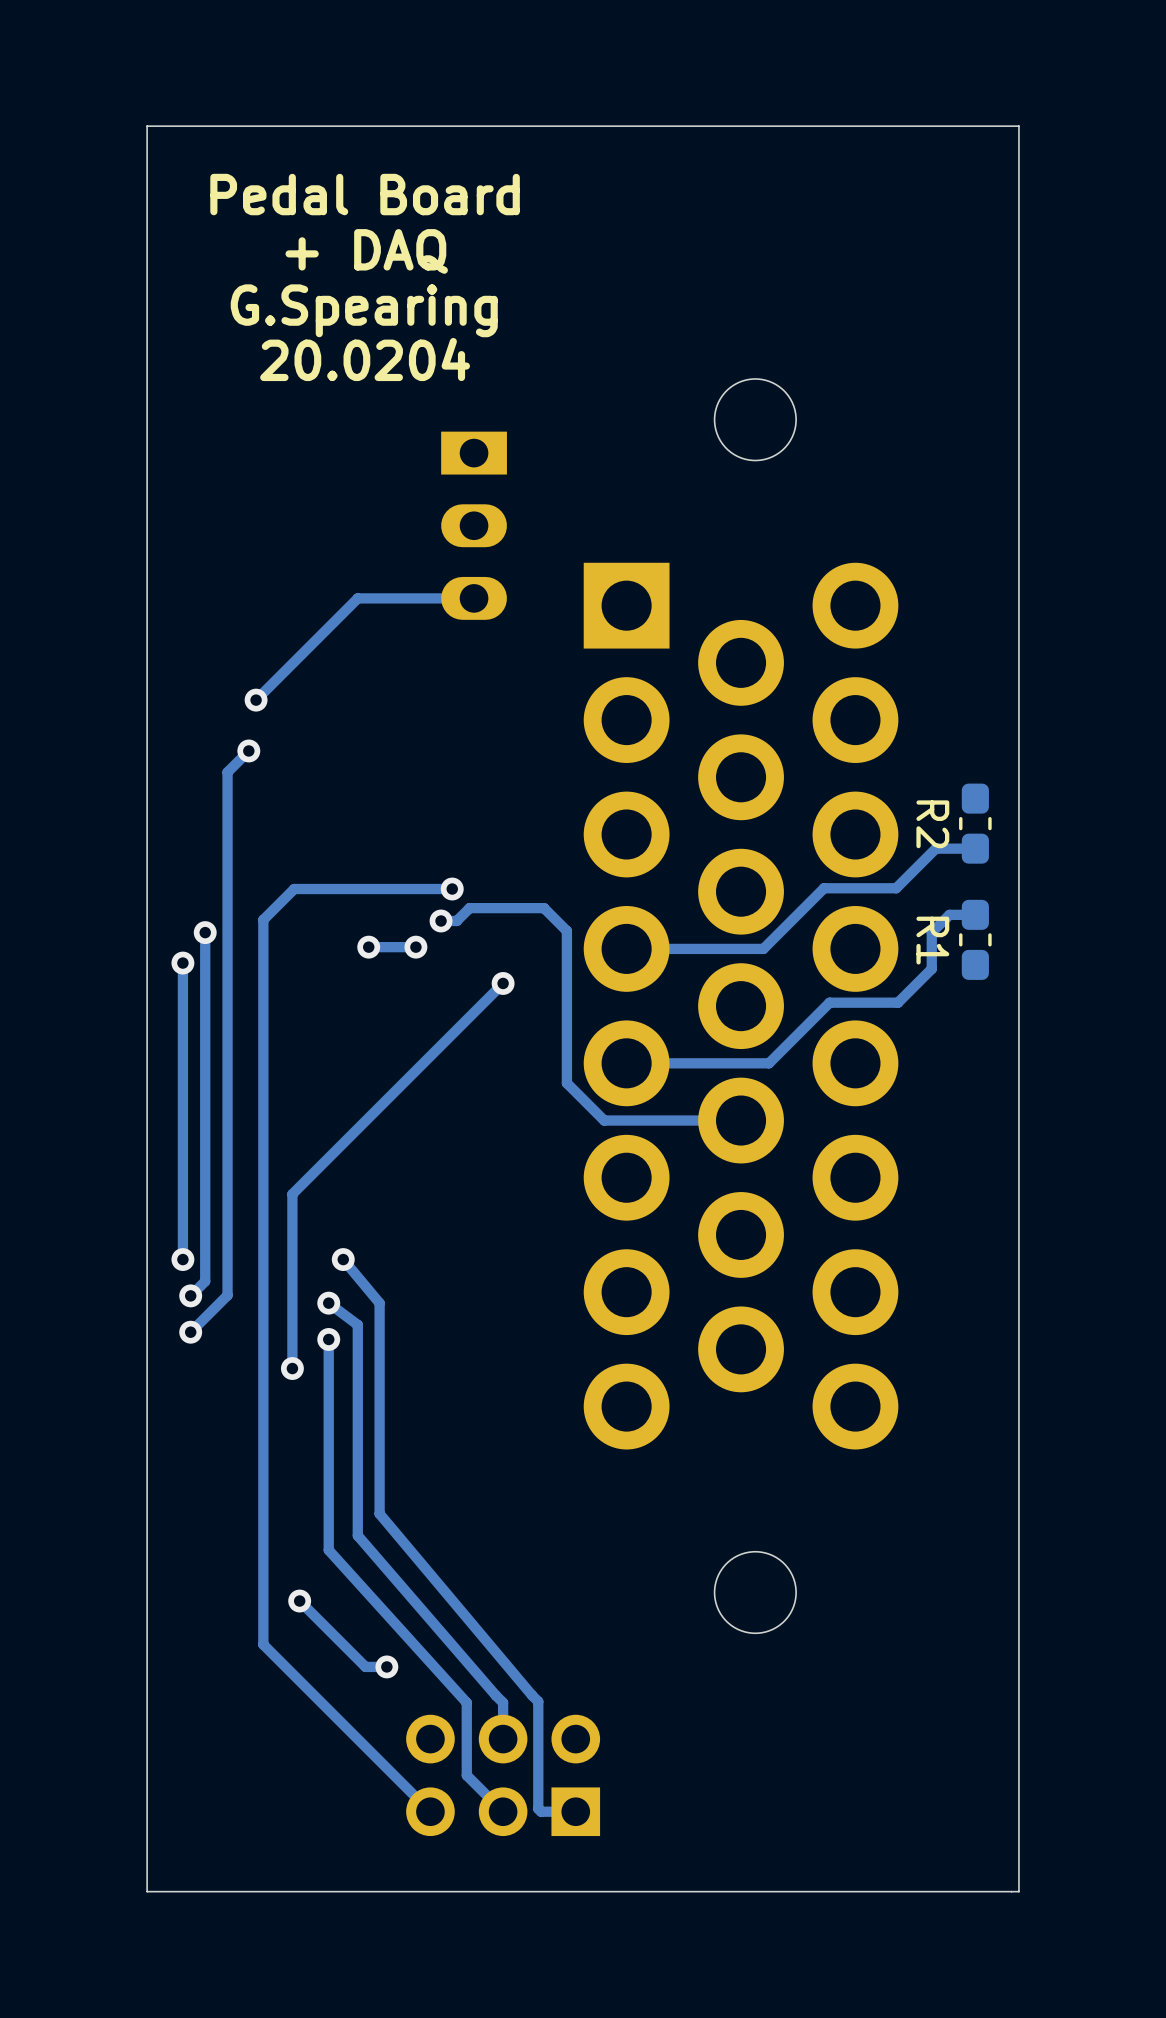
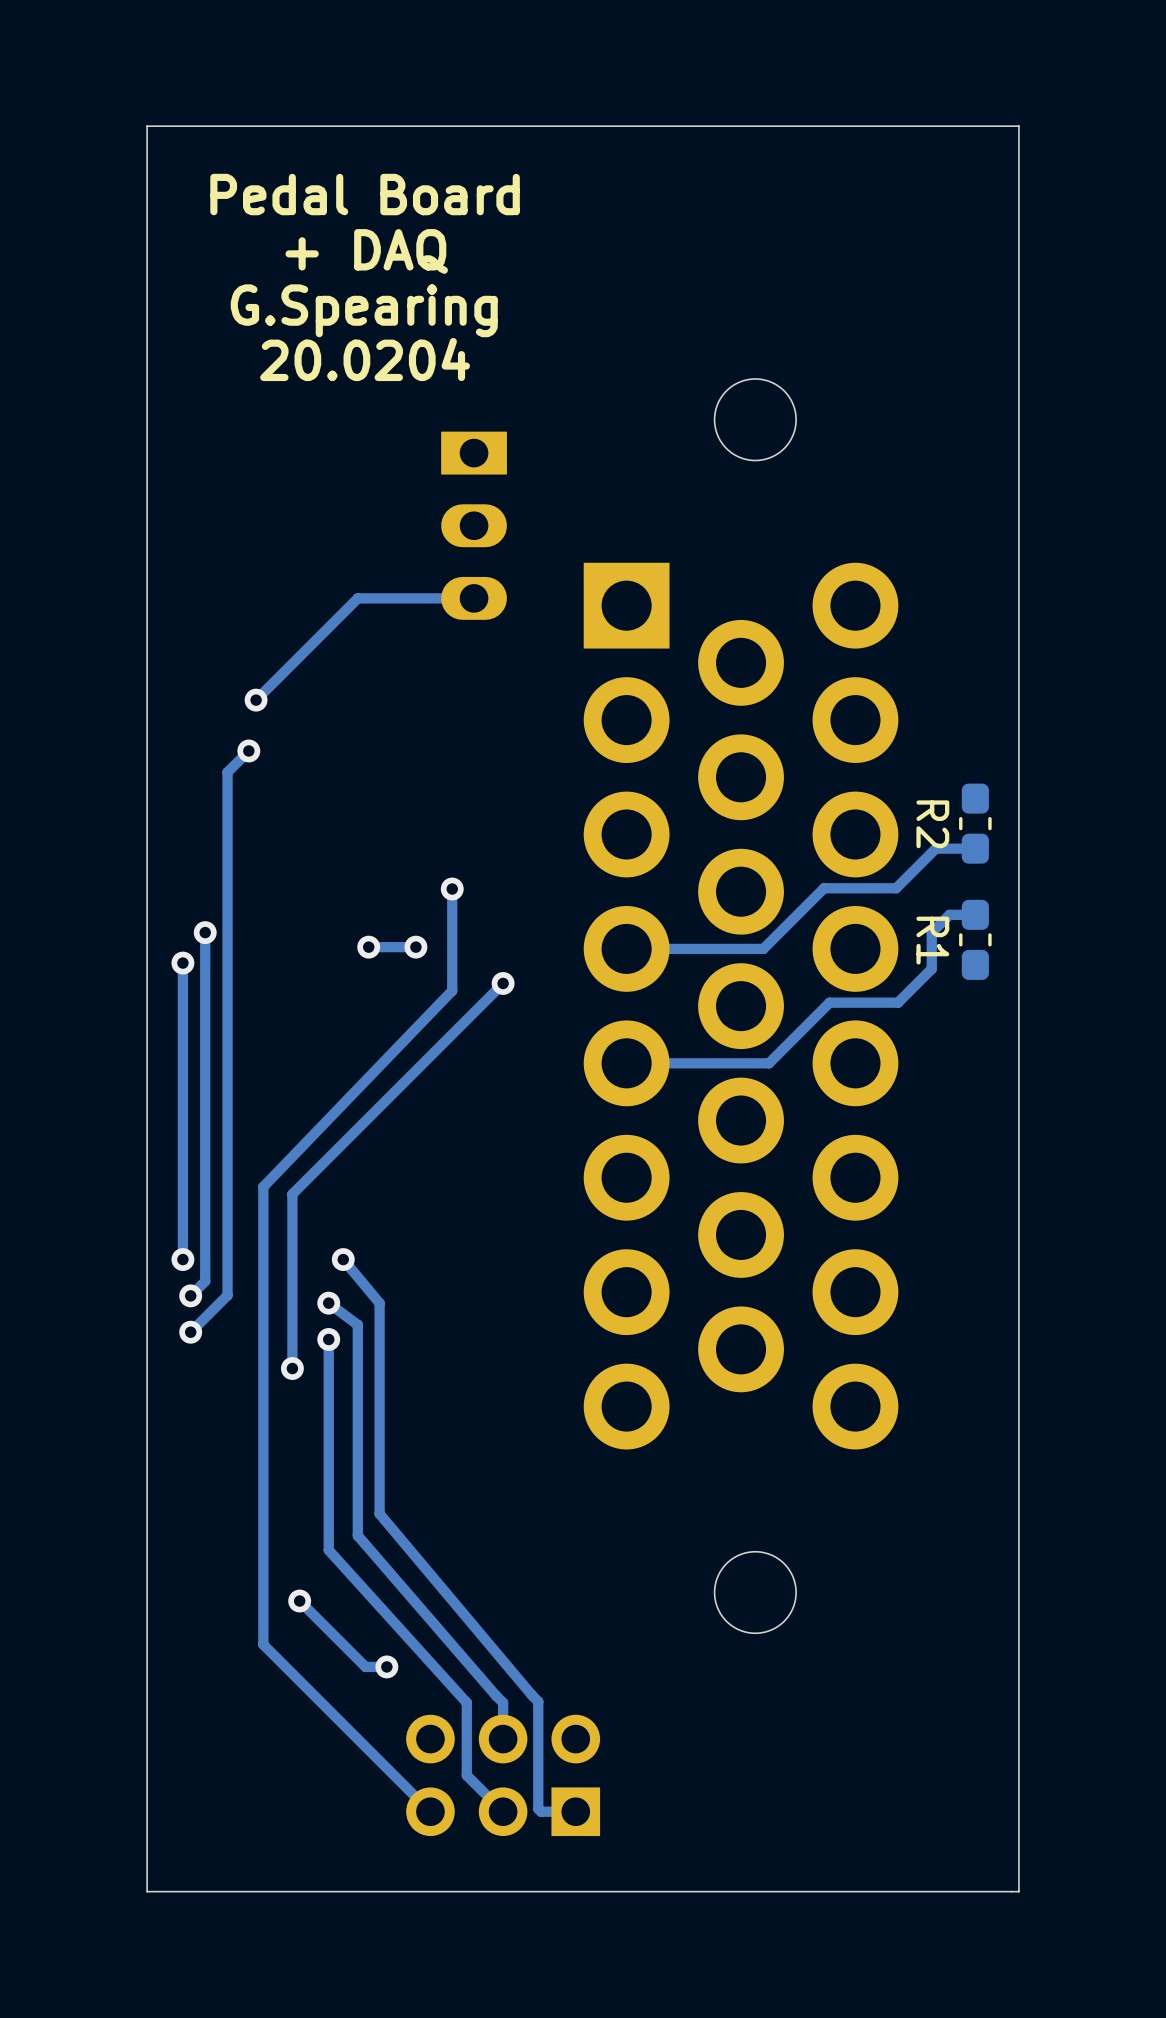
track: (452, 889) (294, 889) (263, 919) (263, 1186) -> (452, 889) (452, 990) (263, 1186)
track: (441, 920) (456, 920) (469, 908) (544, 908) (566, 931) (566, 1083) (604, 1120) (741, 1120) -> none
via: (441, 920) -> none

